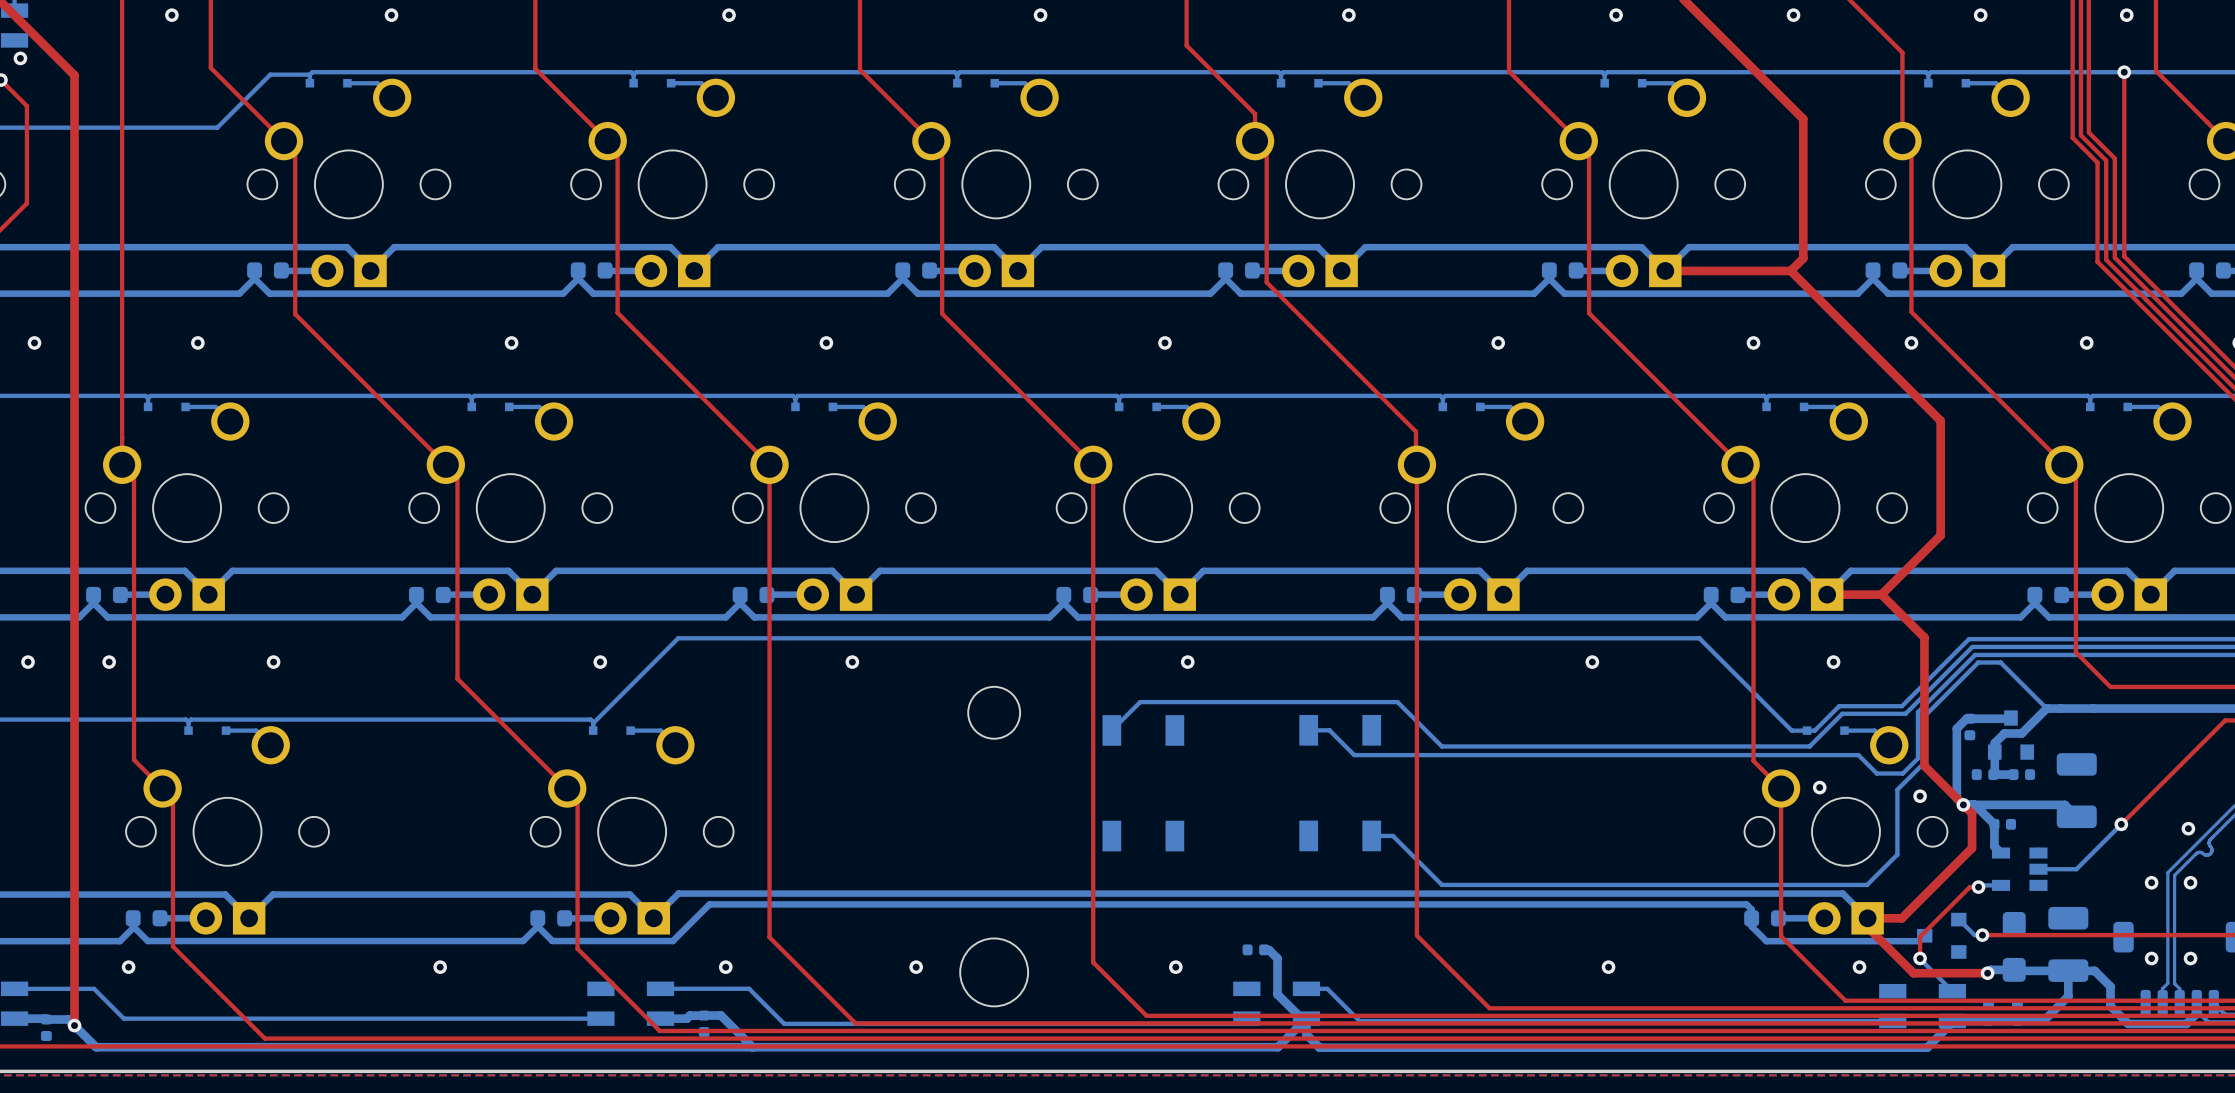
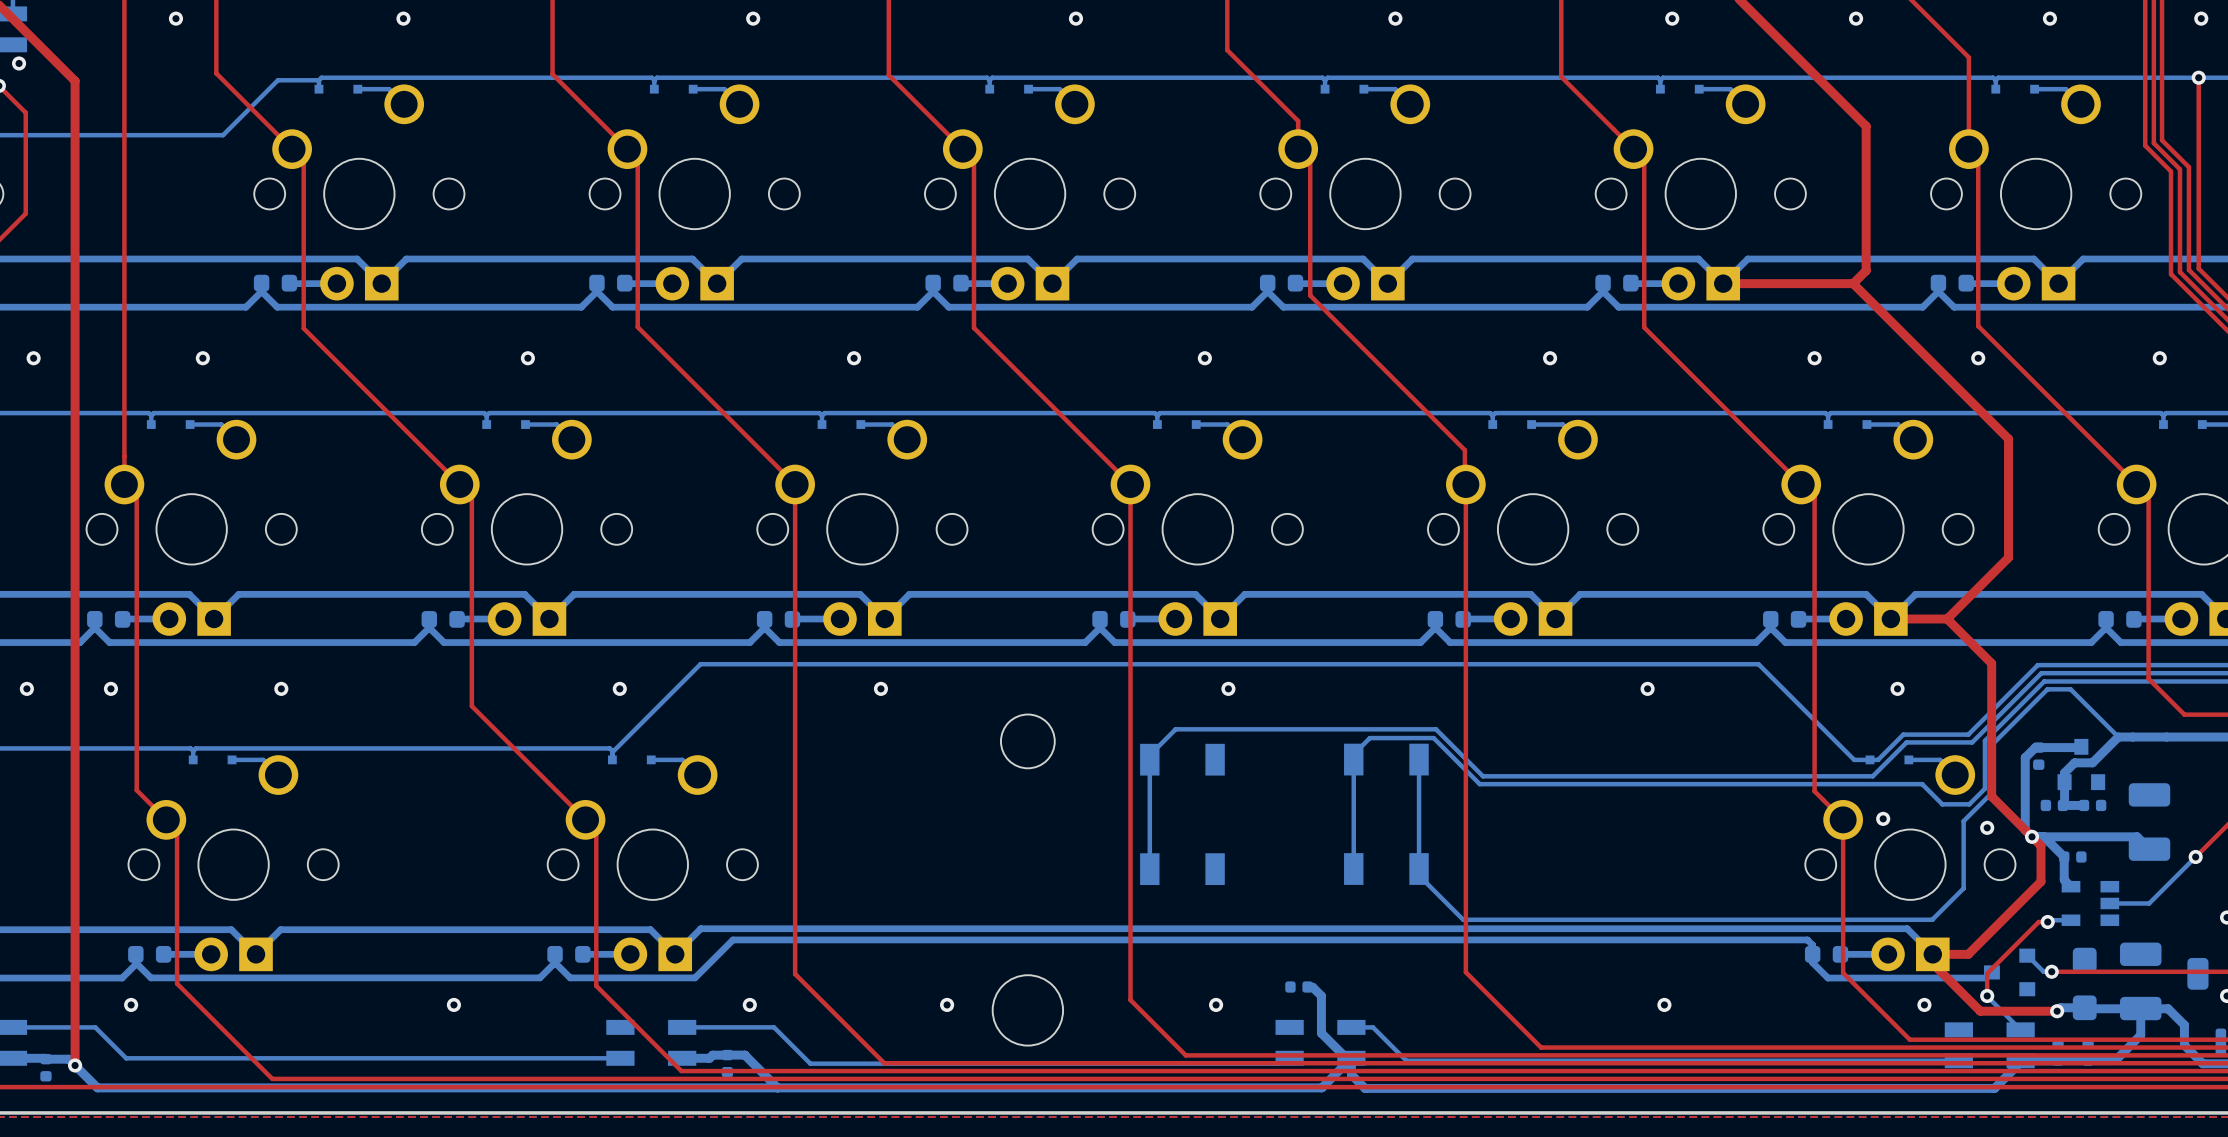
bottom track: (1111, 730) (1140, 702) (1397, 702) (1441, 746) -> (1149, 869) (1149, 755) (1175, 729) (1436, 729) (1483, 776) (1491, 776)
bottom track: (1308, 730) (1329, 730) (1354, 755) (1858, 755) -> (1353, 869) (1353, 754) (1369, 738) (1433, 738) (1479, 784) (1923, 785)
bottom track: (1371, 835) (1392, 835) (1441, 884) -> (1419, 759) (1419, 875) (1463, 919) (1491, 919)

